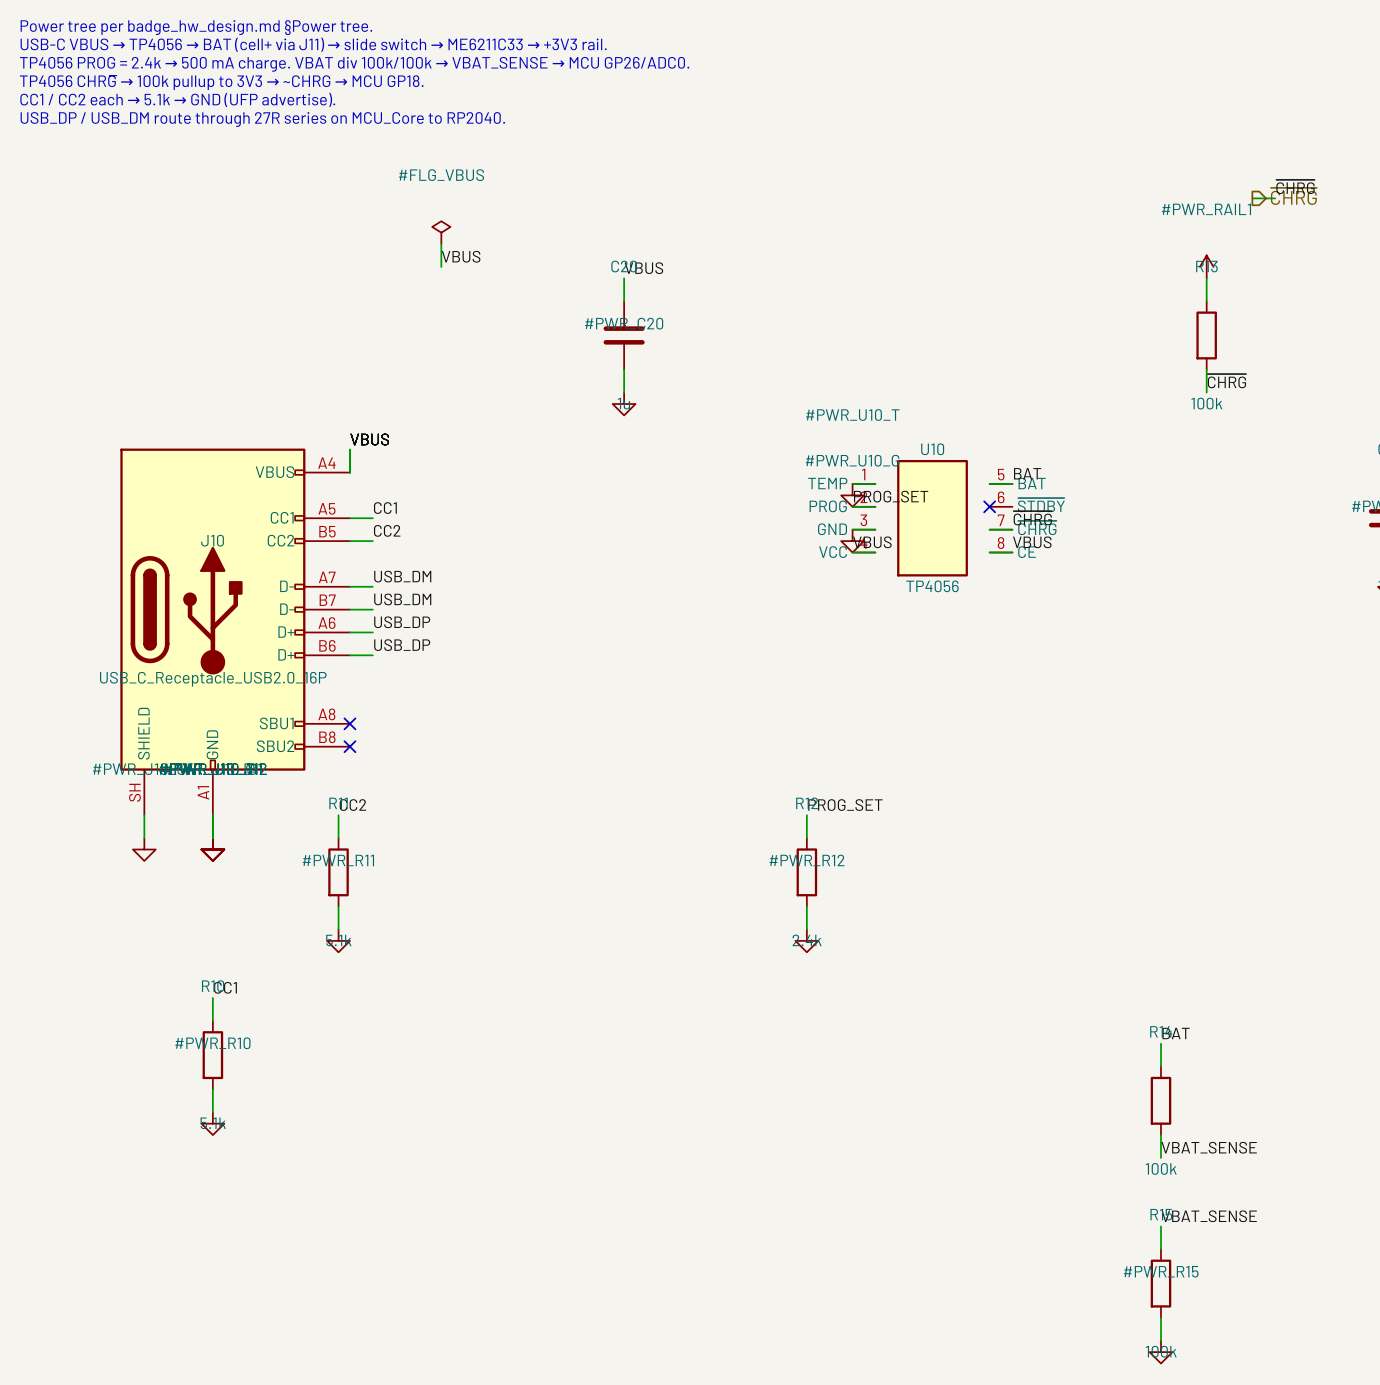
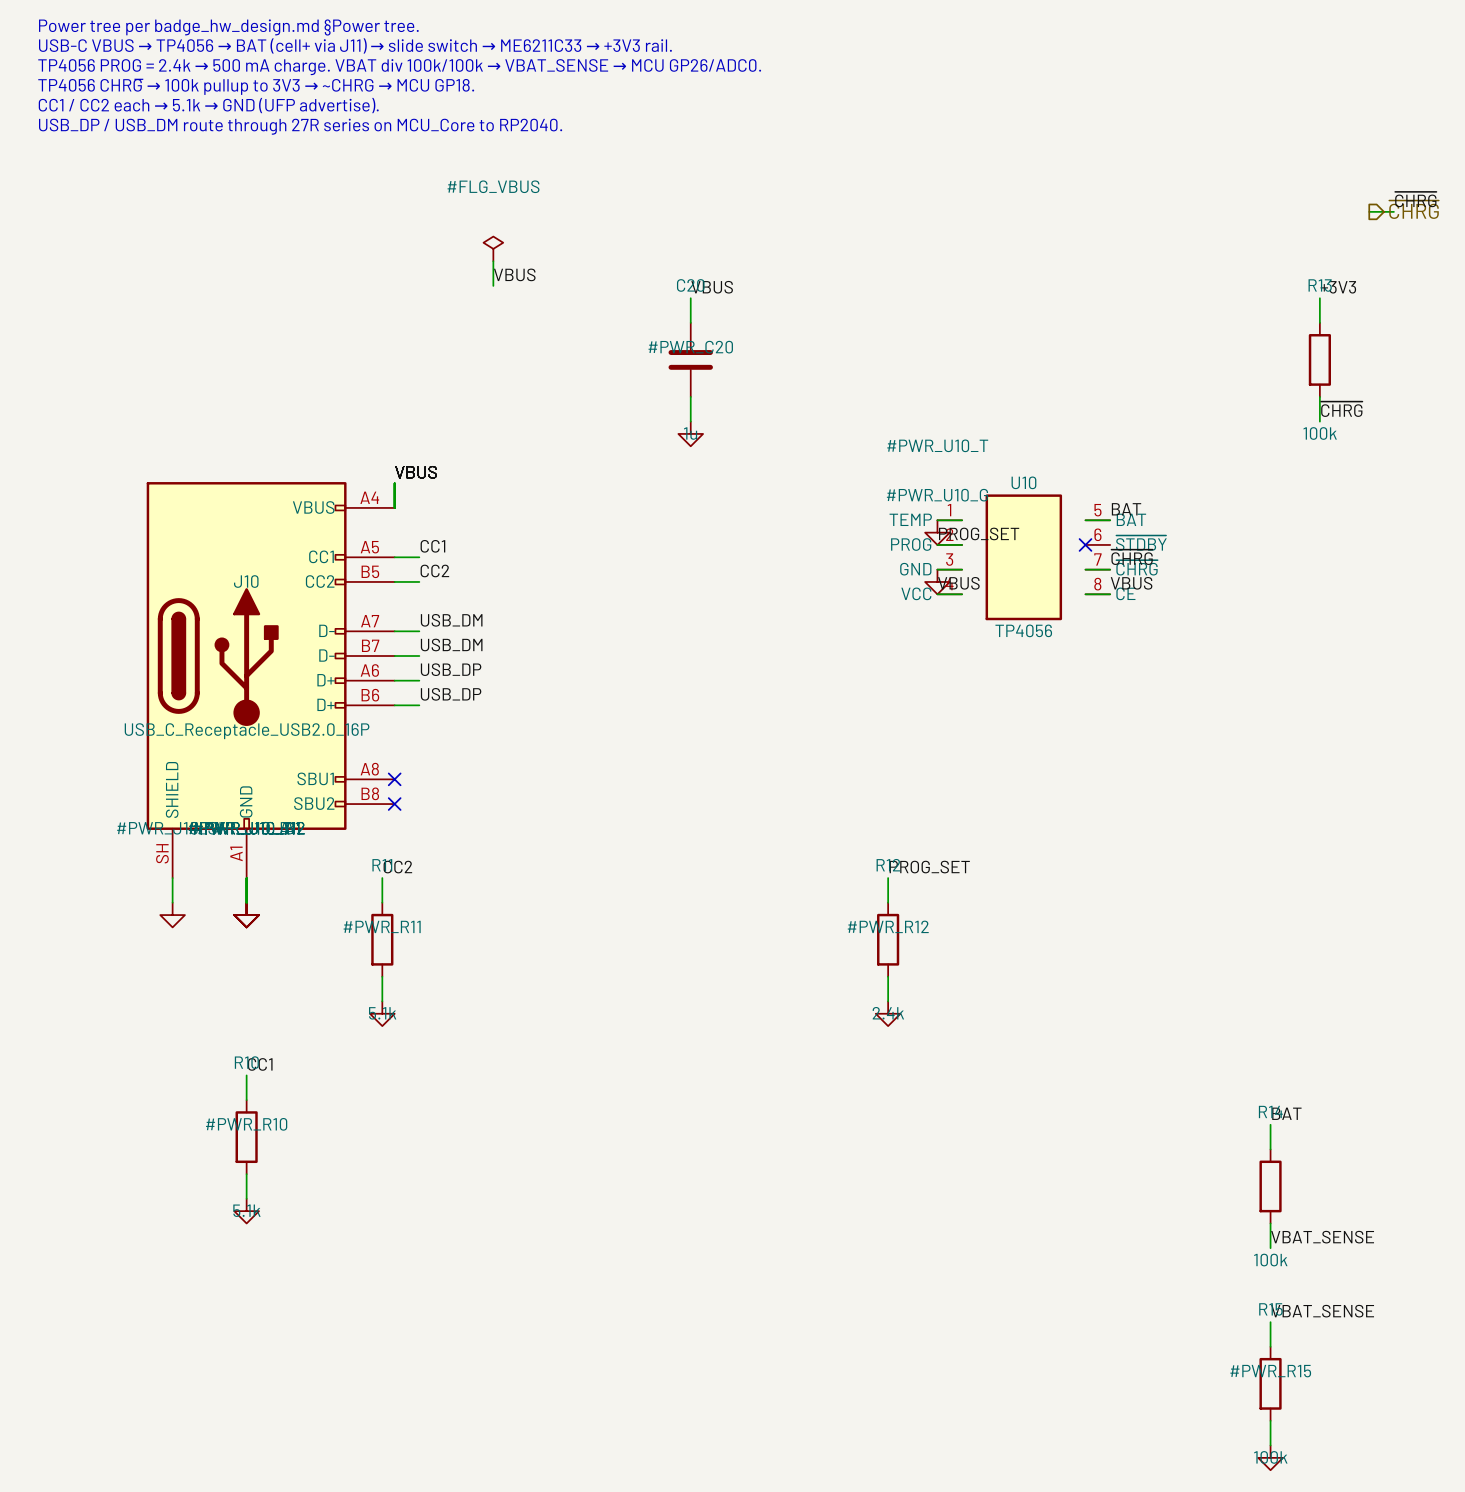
#PWR_RAIL1: (1206, 266) -> none
label: none -> +3V3 (1338, 287)

